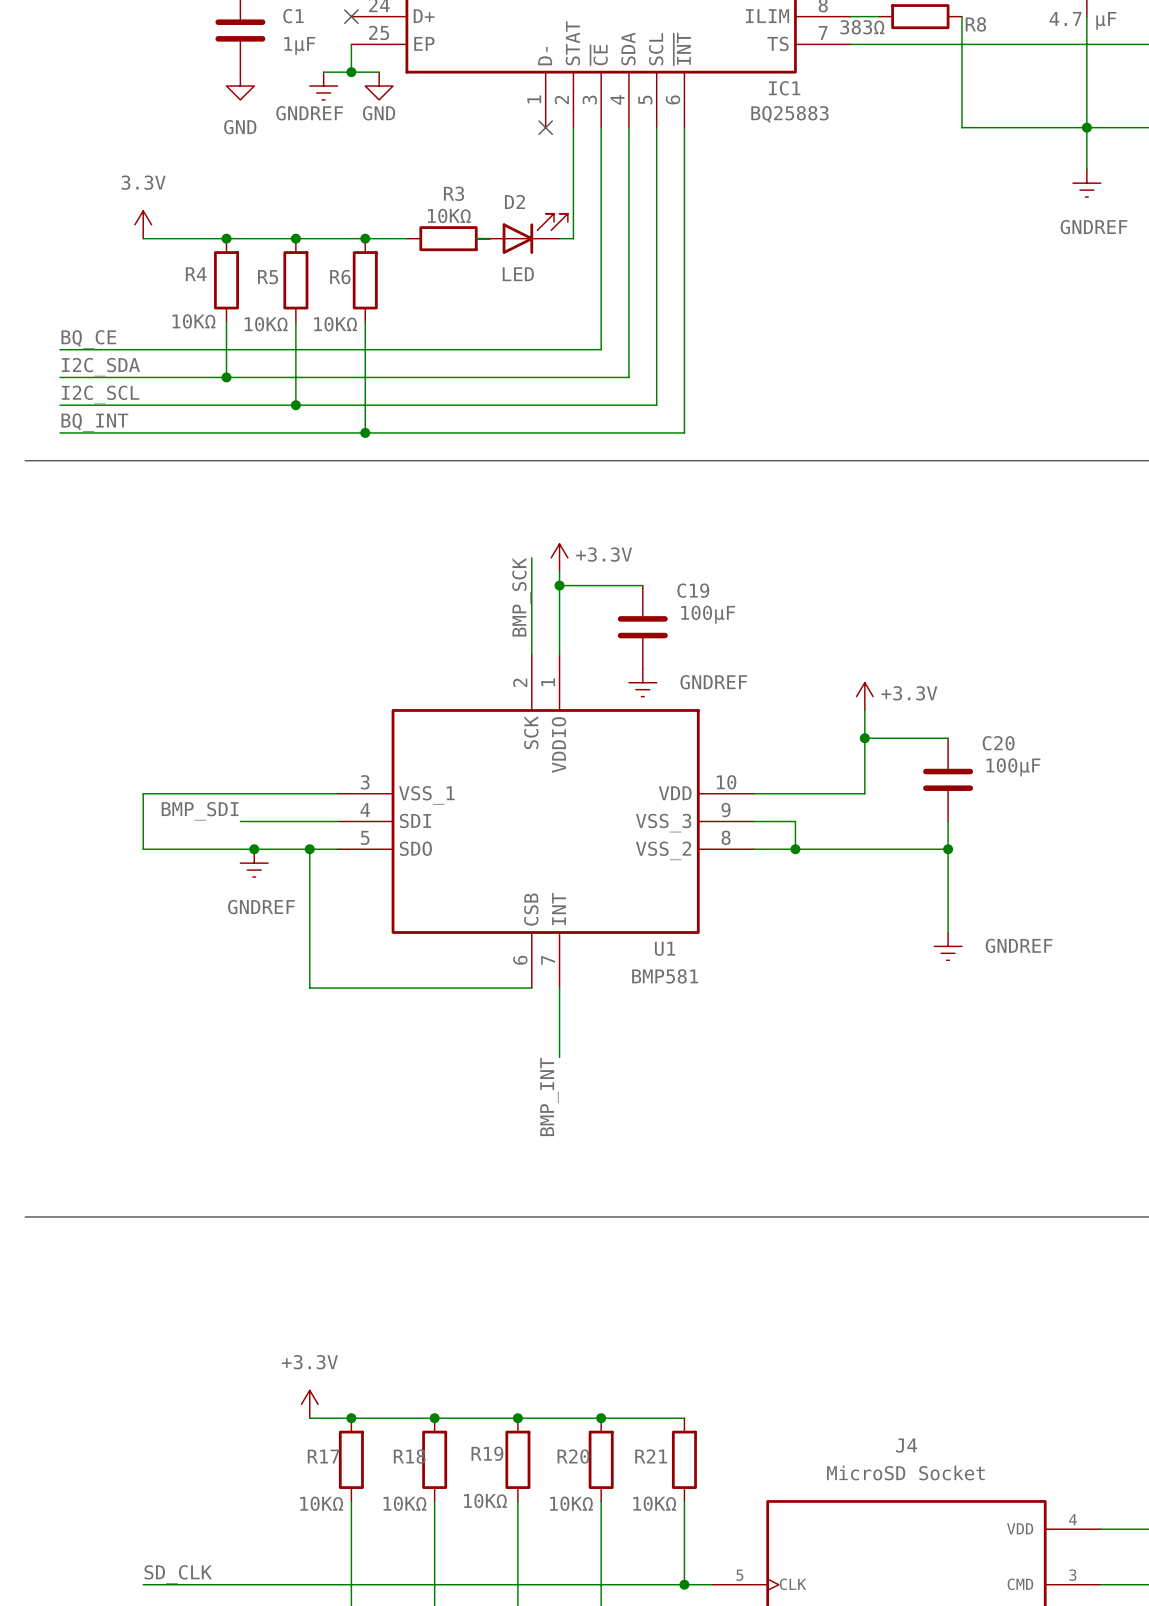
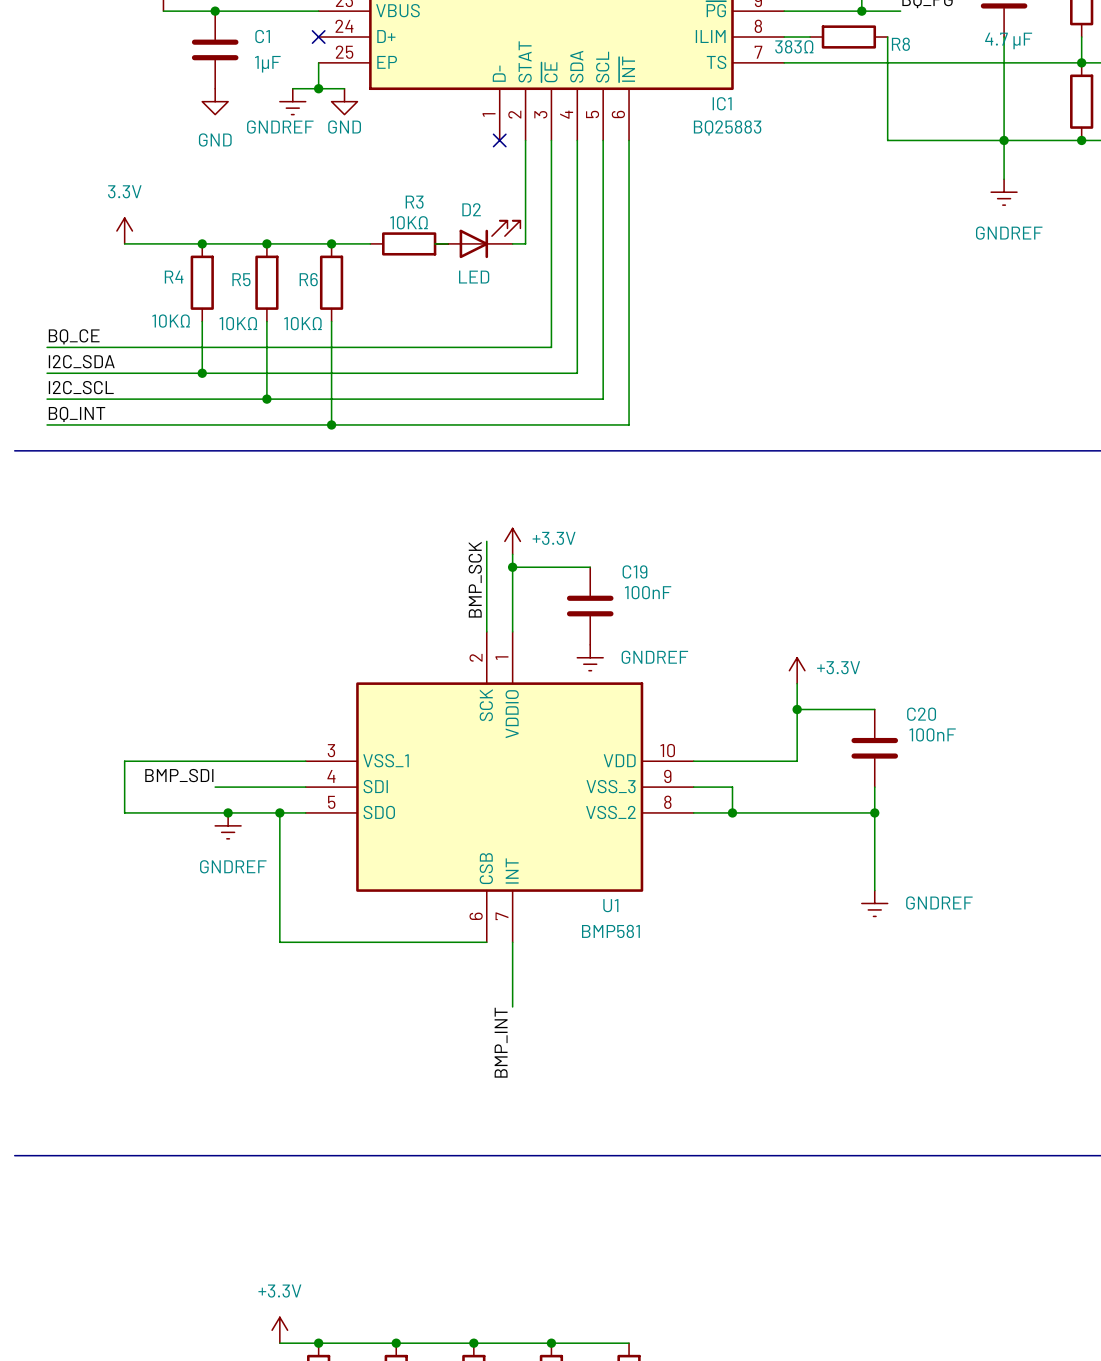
C19 value: 100μF (708, 614) -> 100nF (648, 592)
C20 value: 100μF (1013, 767) -> 100nF (932, 734)

